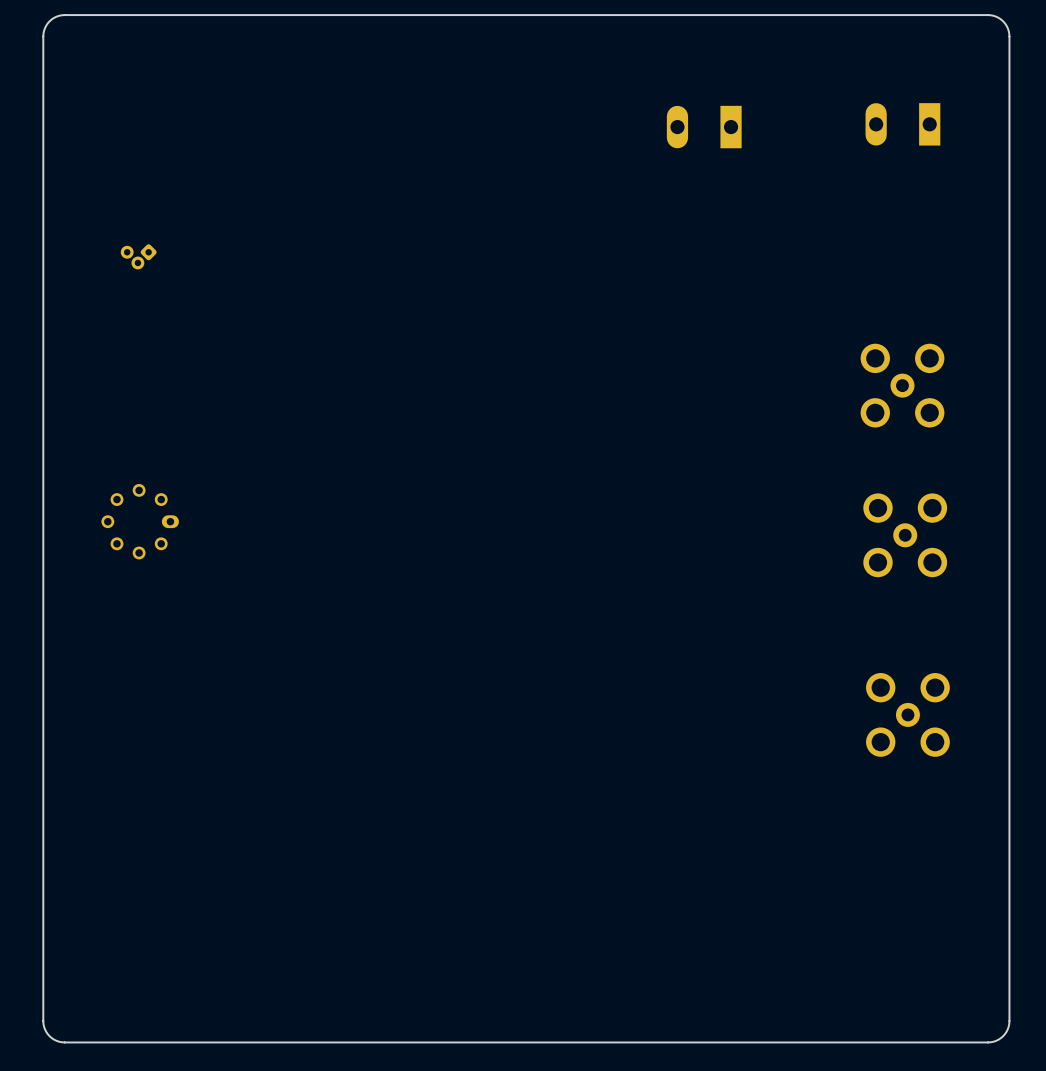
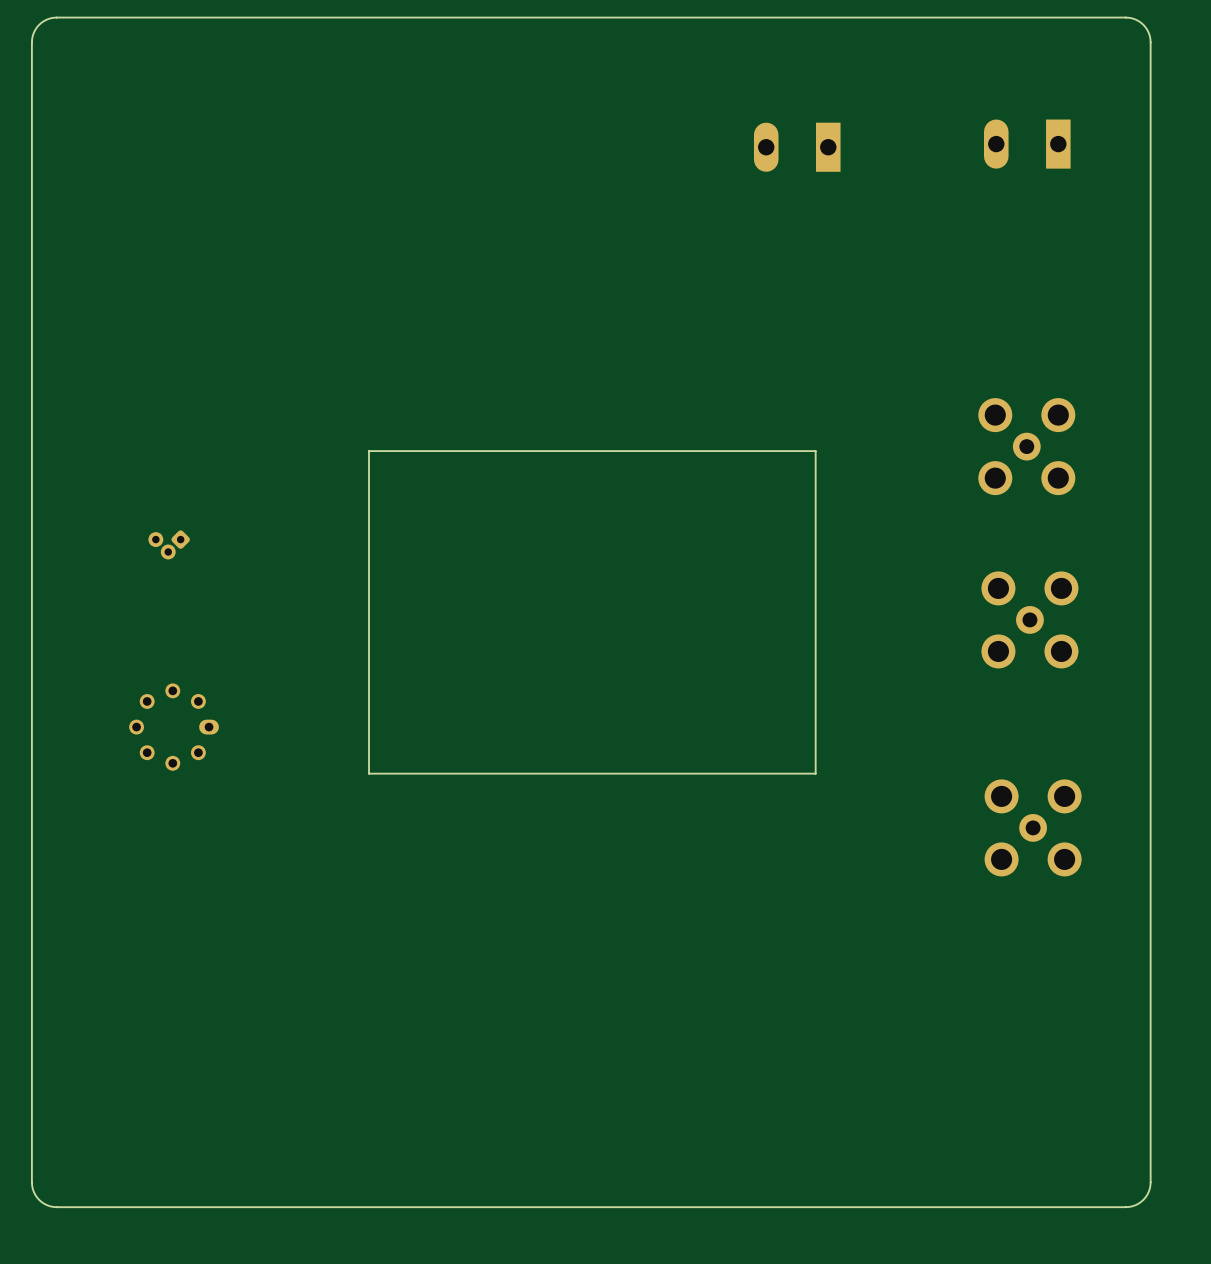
part position: (138, 256) -> (169, 544)
board edge: none -> (815, 451) (815, 773) (369, 773) (369, 451) (815, 451)
part position: (140, 521) -> (174, 727)

